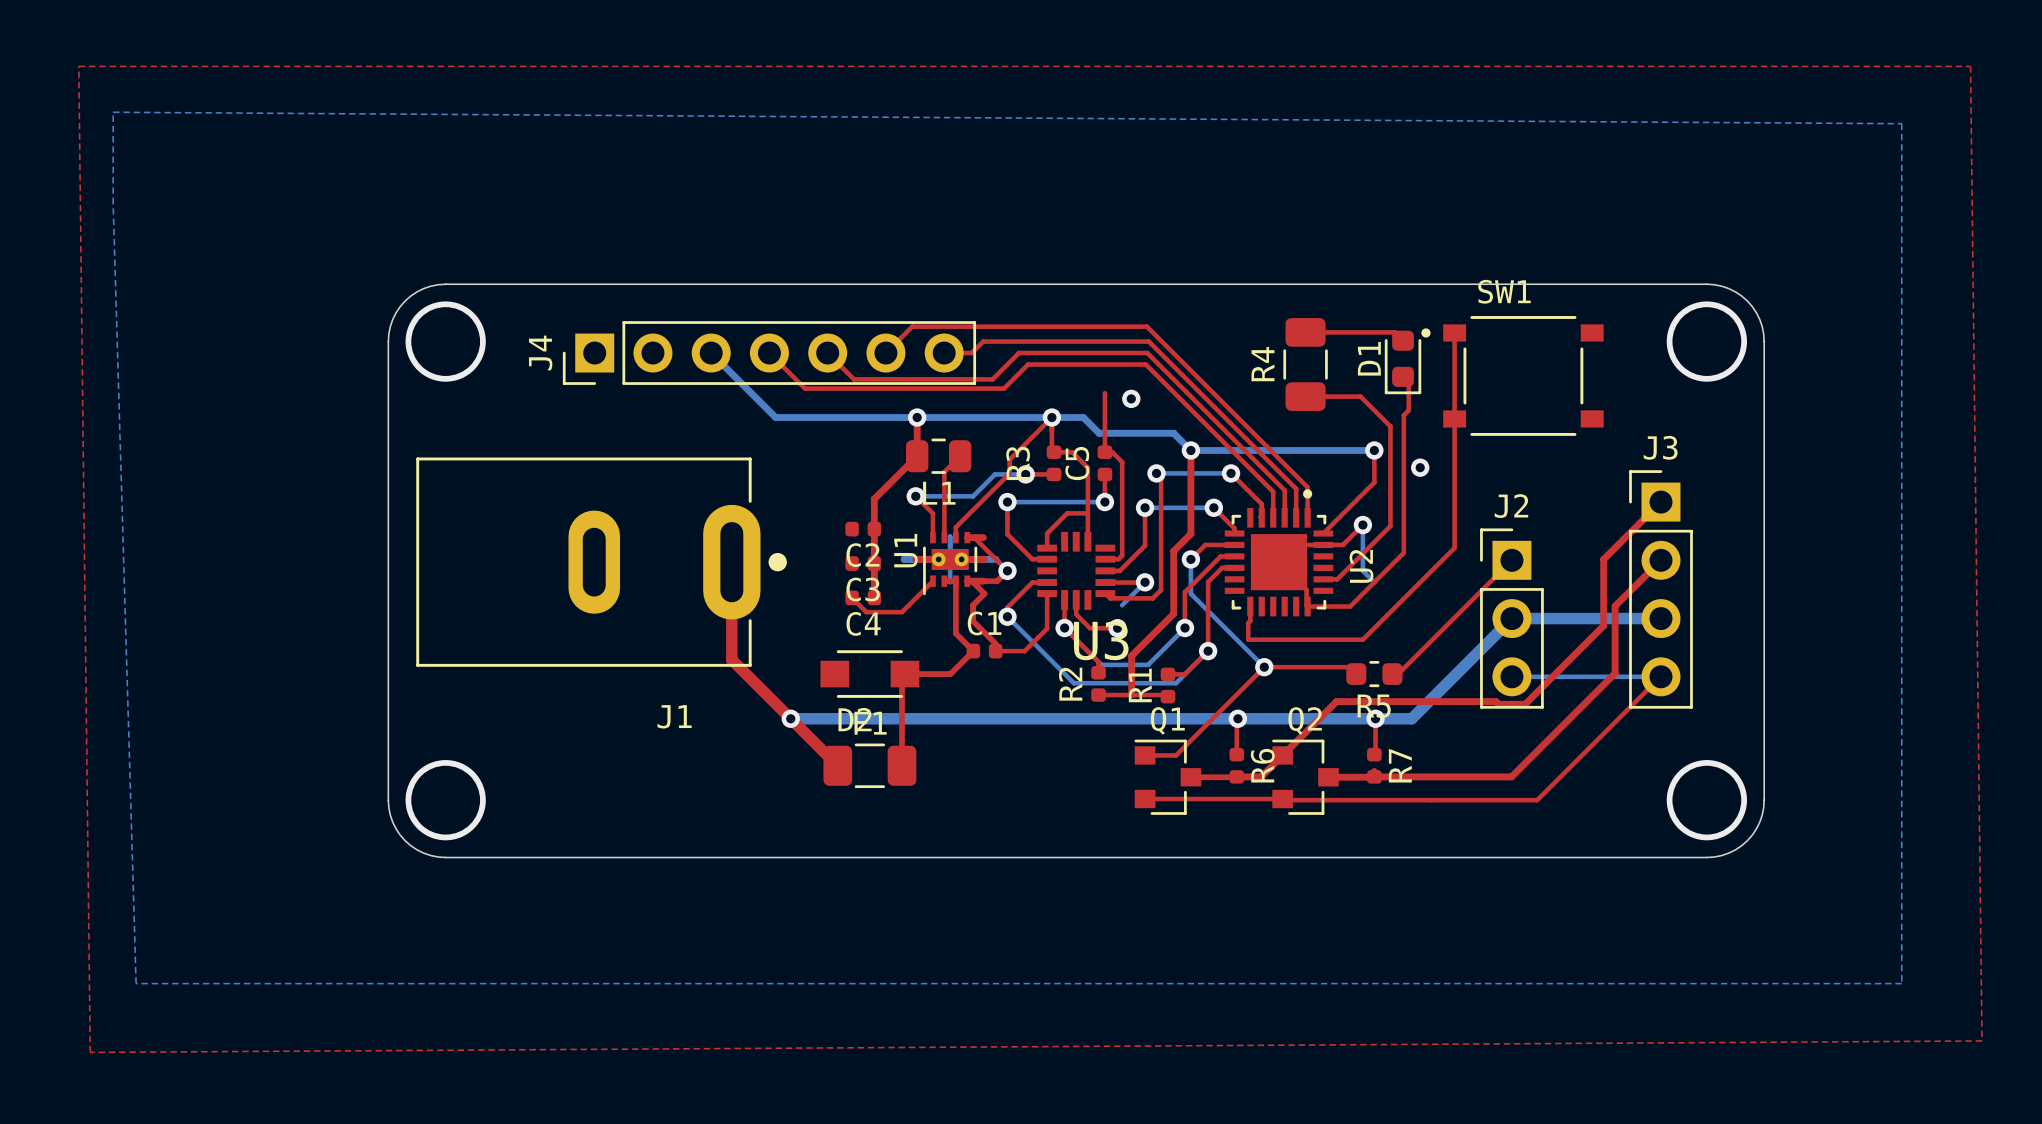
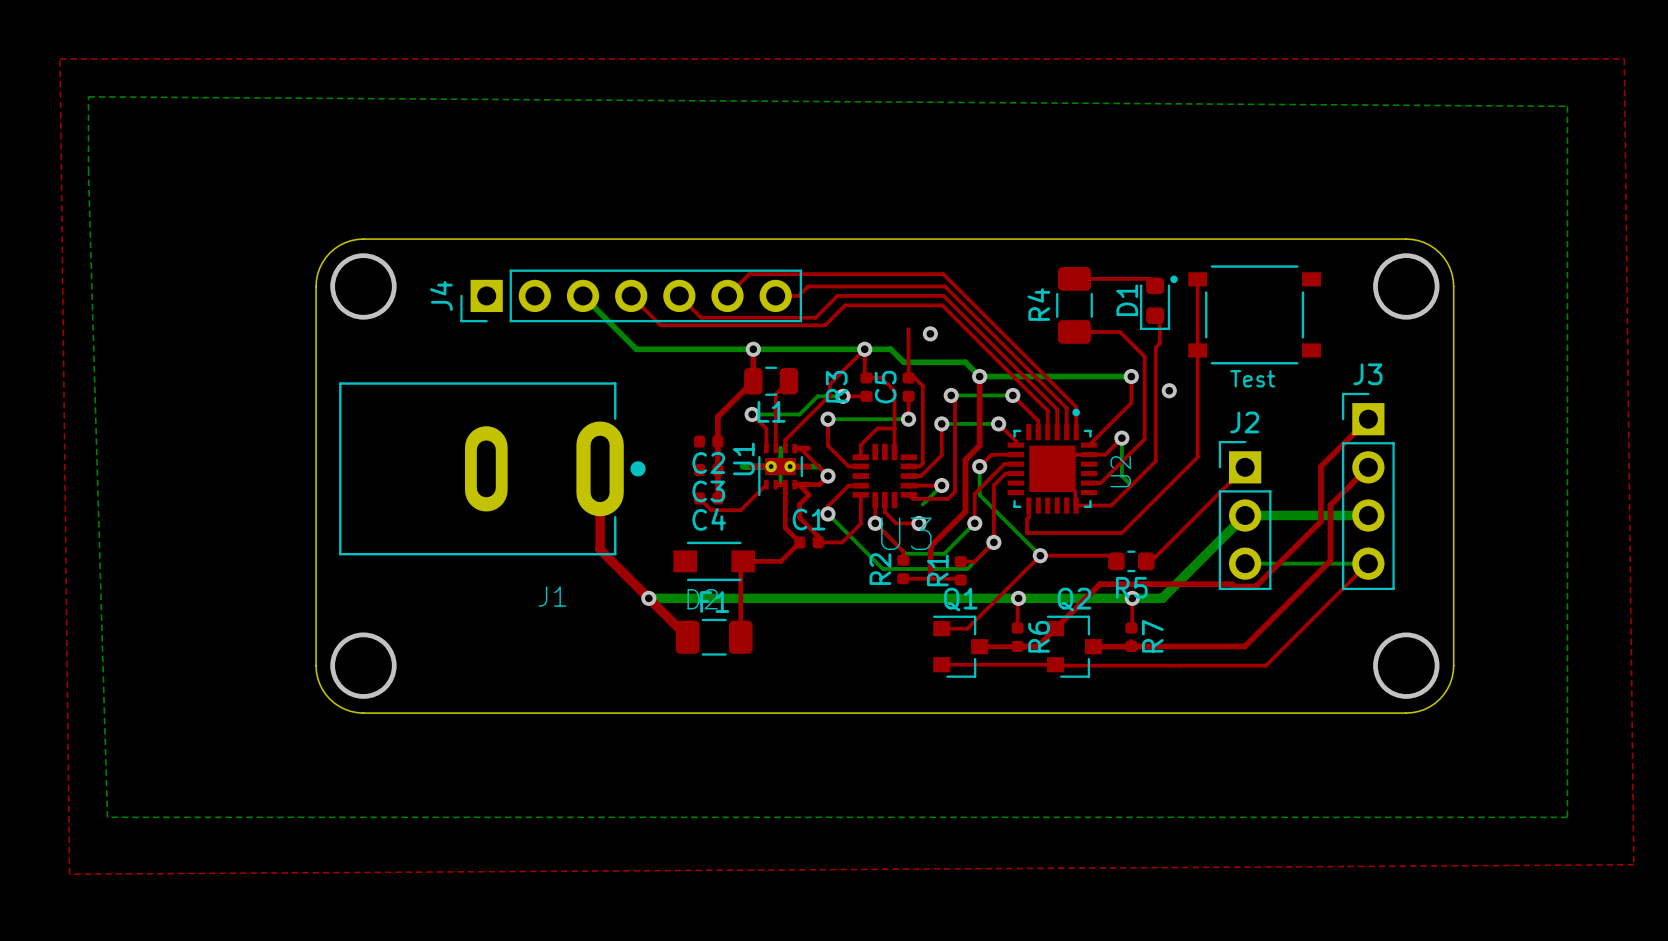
SW1 name: SW1 (1504, 291) -> Test (1252, 378)

